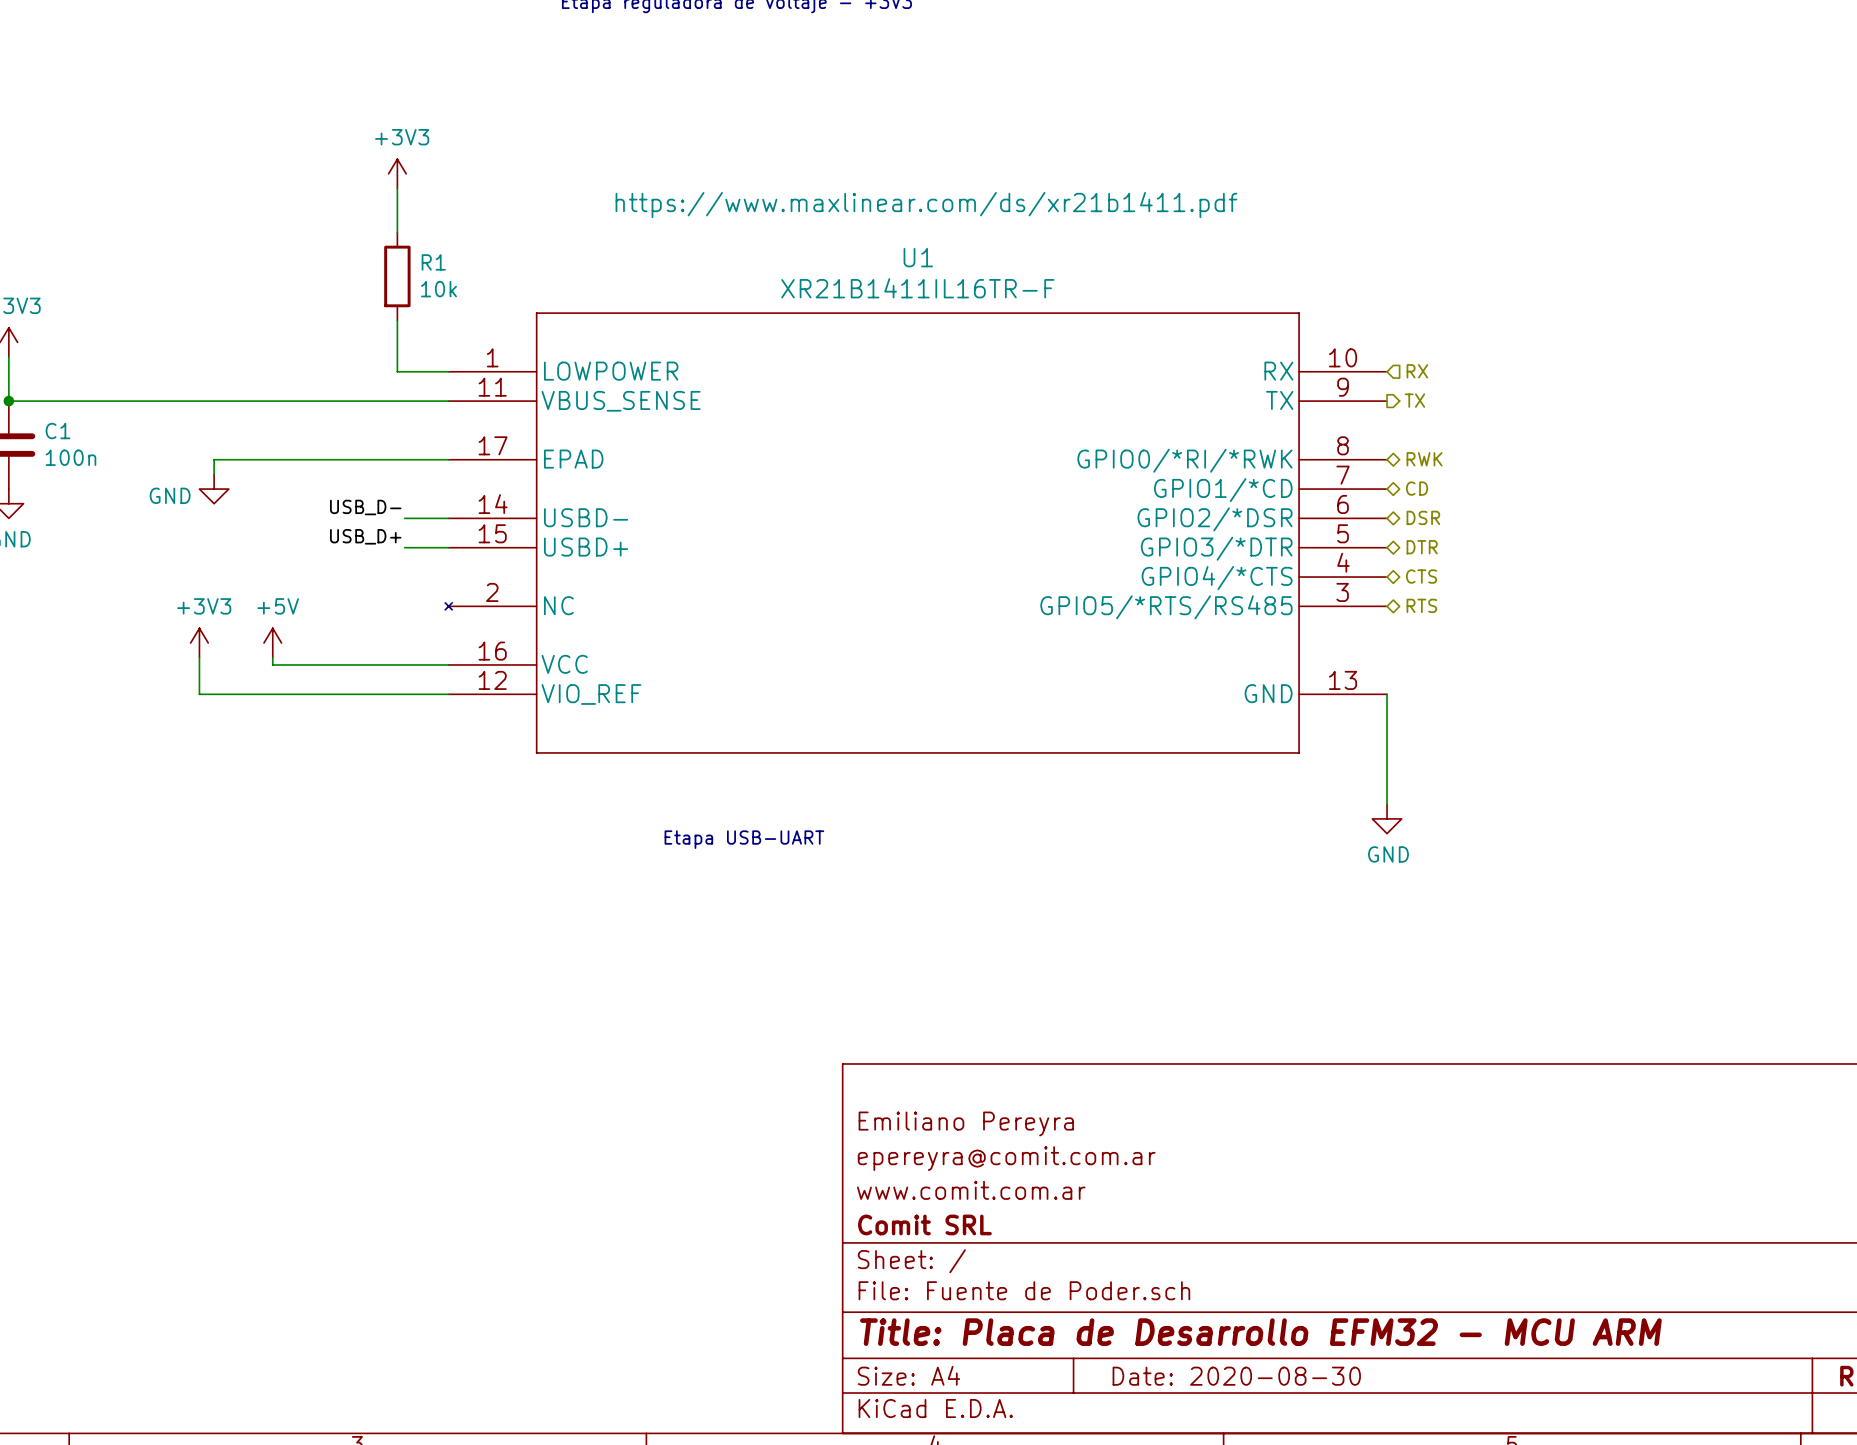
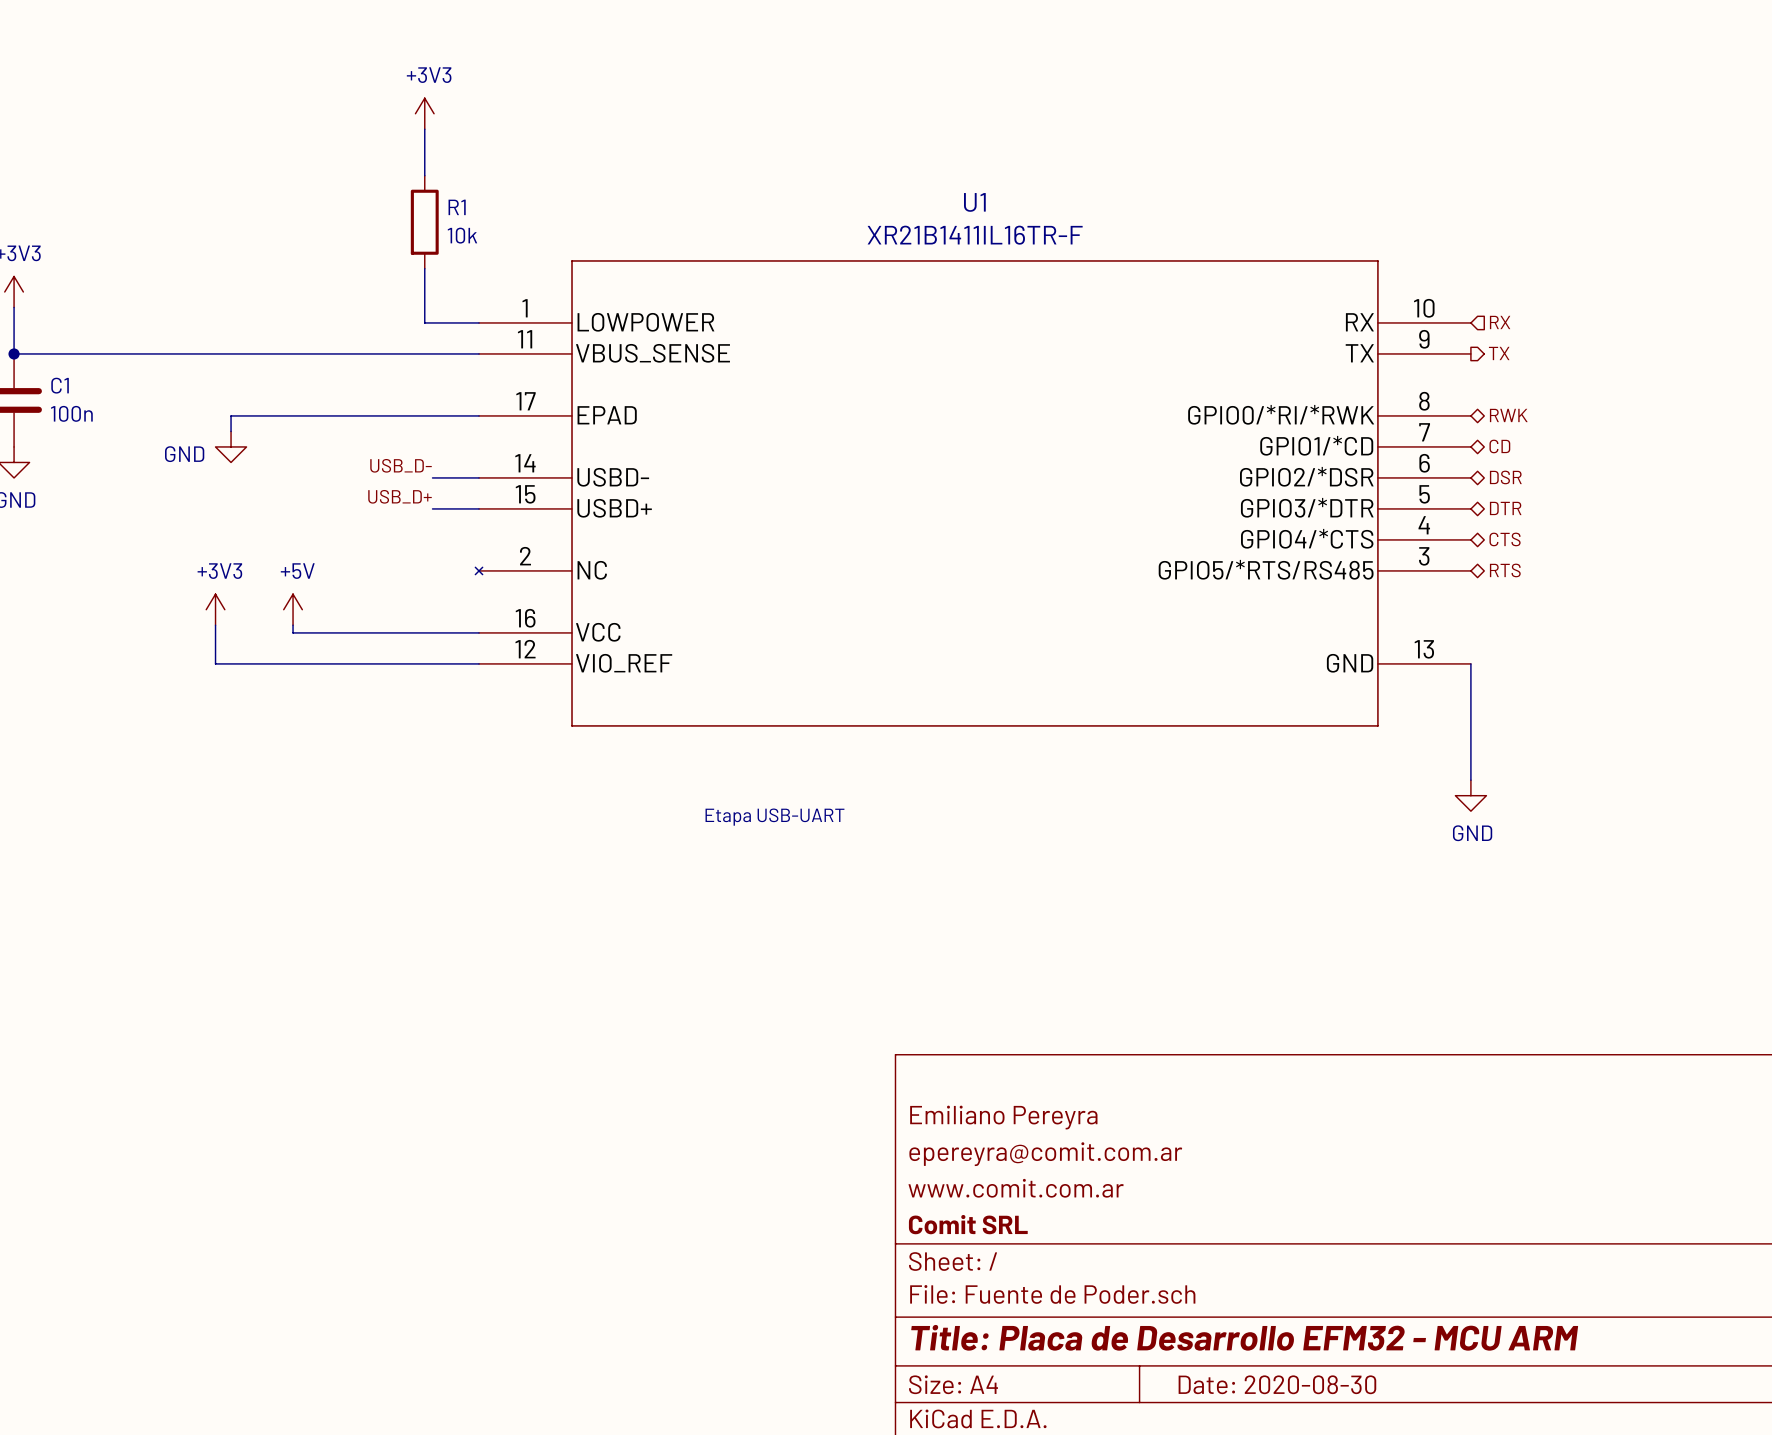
U1 text: https://www.maxlinear.com/ds/xr21b1411.pdf (926, 205) -> none

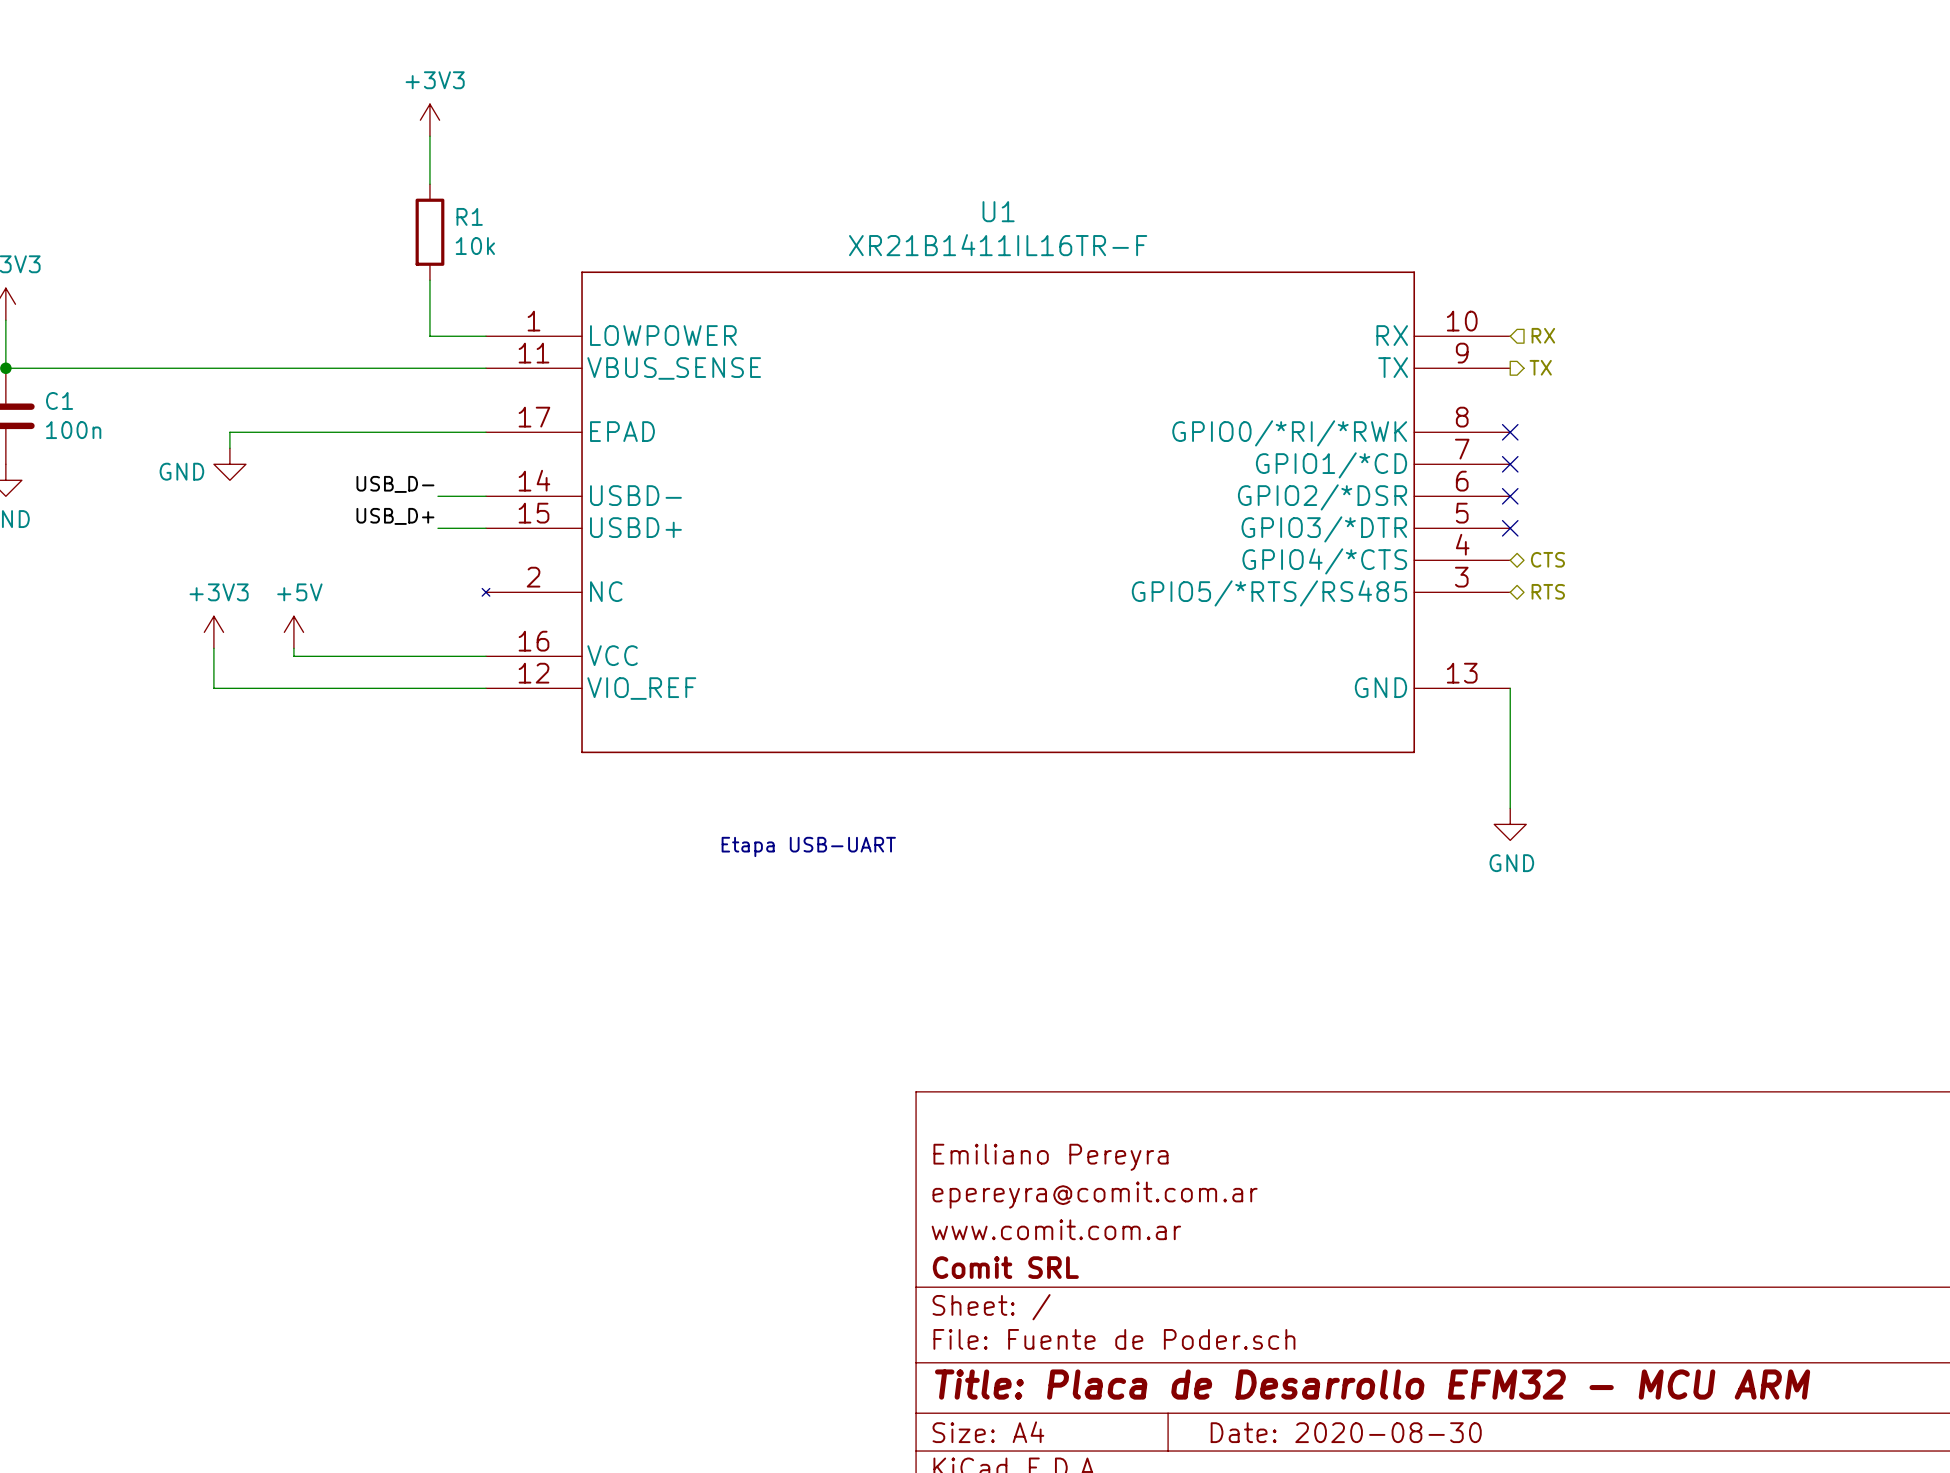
no-connect mark: none -> (1510, 432)
hierarchical label: RWK (1508, 415) -> none
no-connect mark: none -> (1510, 464)
hierarchical label: CD (1499, 446) -> none
no-connect mark: none -> (1510, 496)
hierarchical label: DSR (1505, 477) -> none
no-connect mark: none -> (1510, 528)
hierarchical label: DTR (1505, 508) -> none

